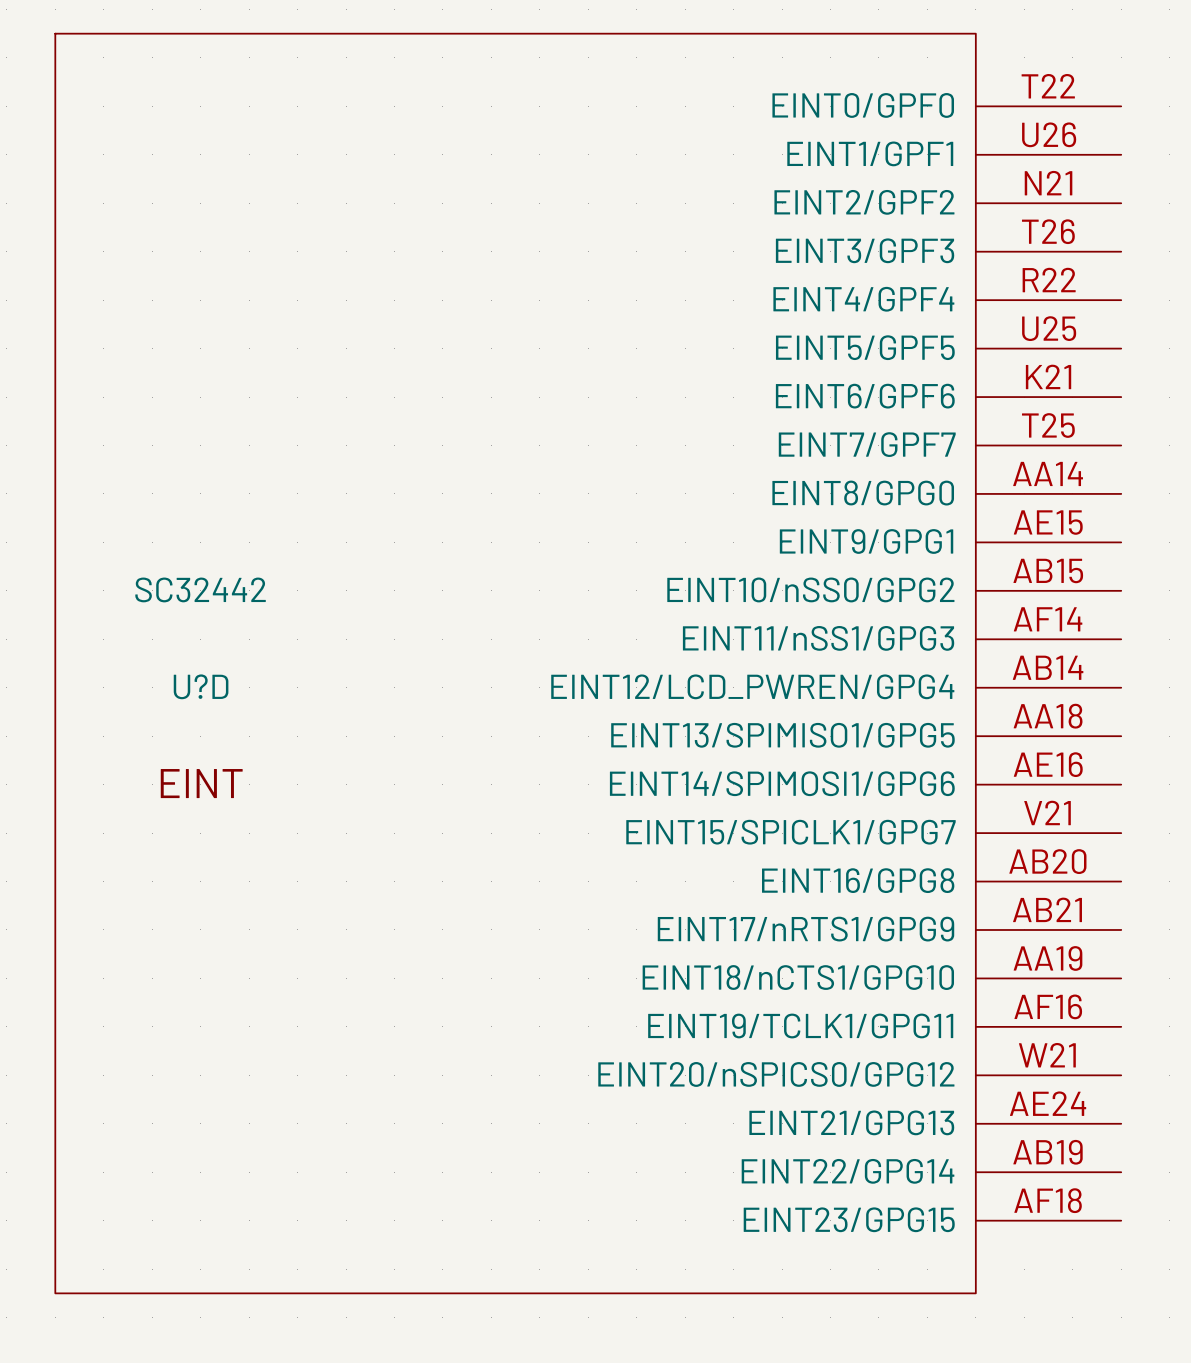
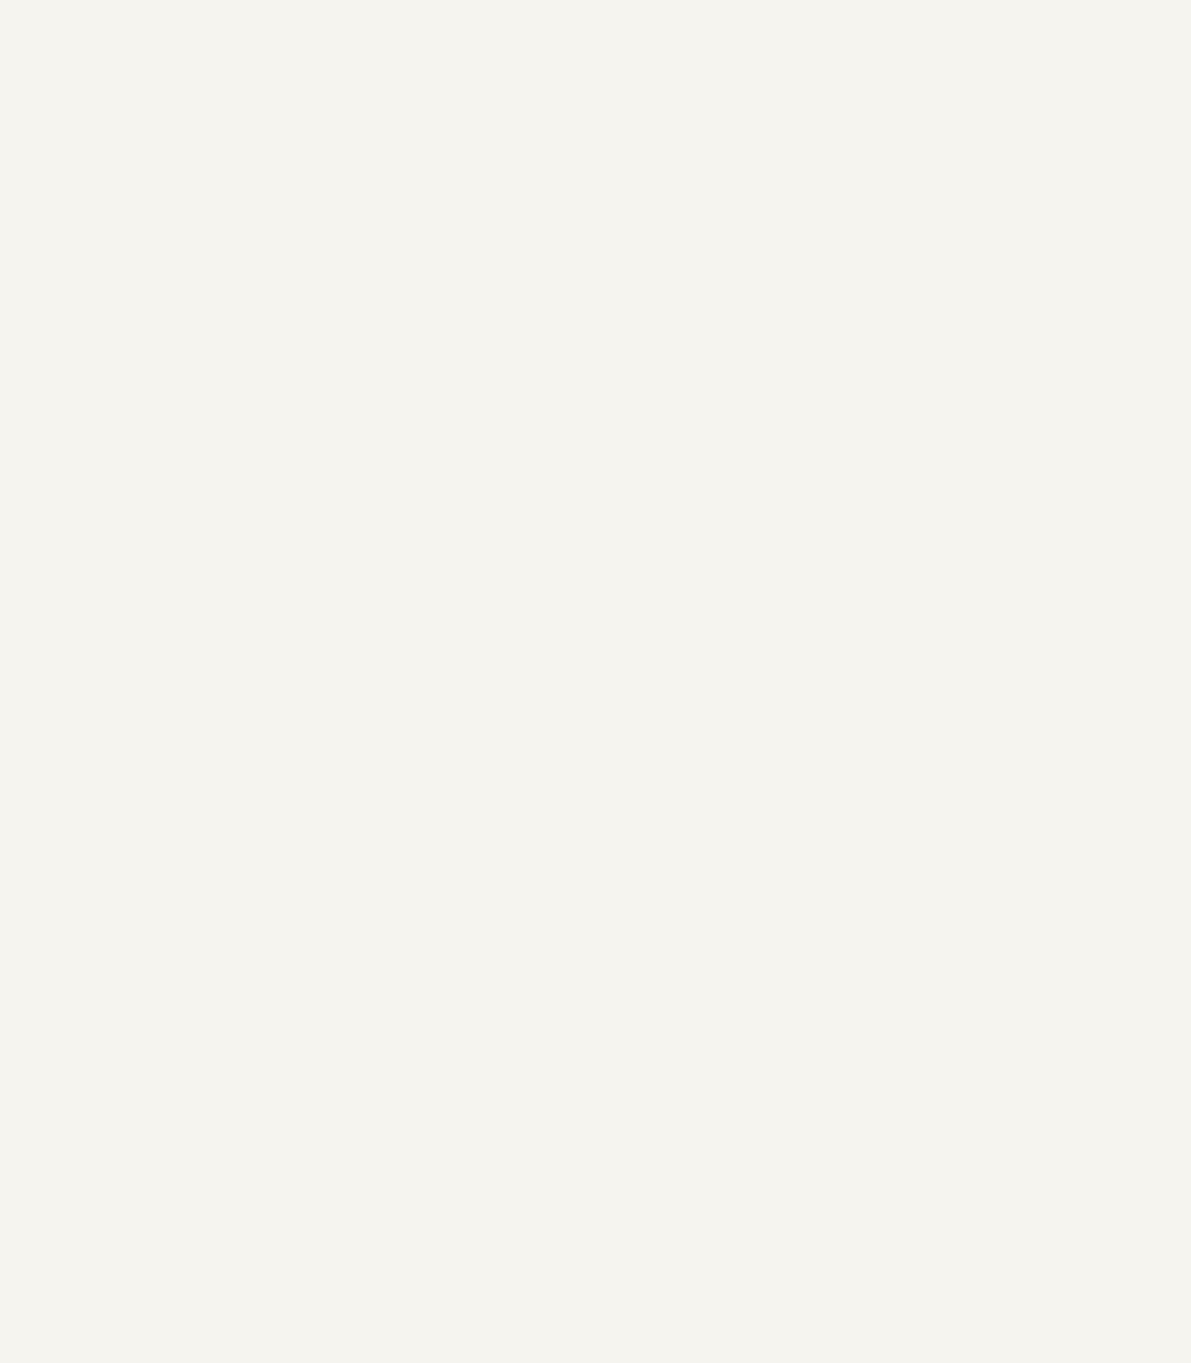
U?D: SC32442 (588, 663) -> none

